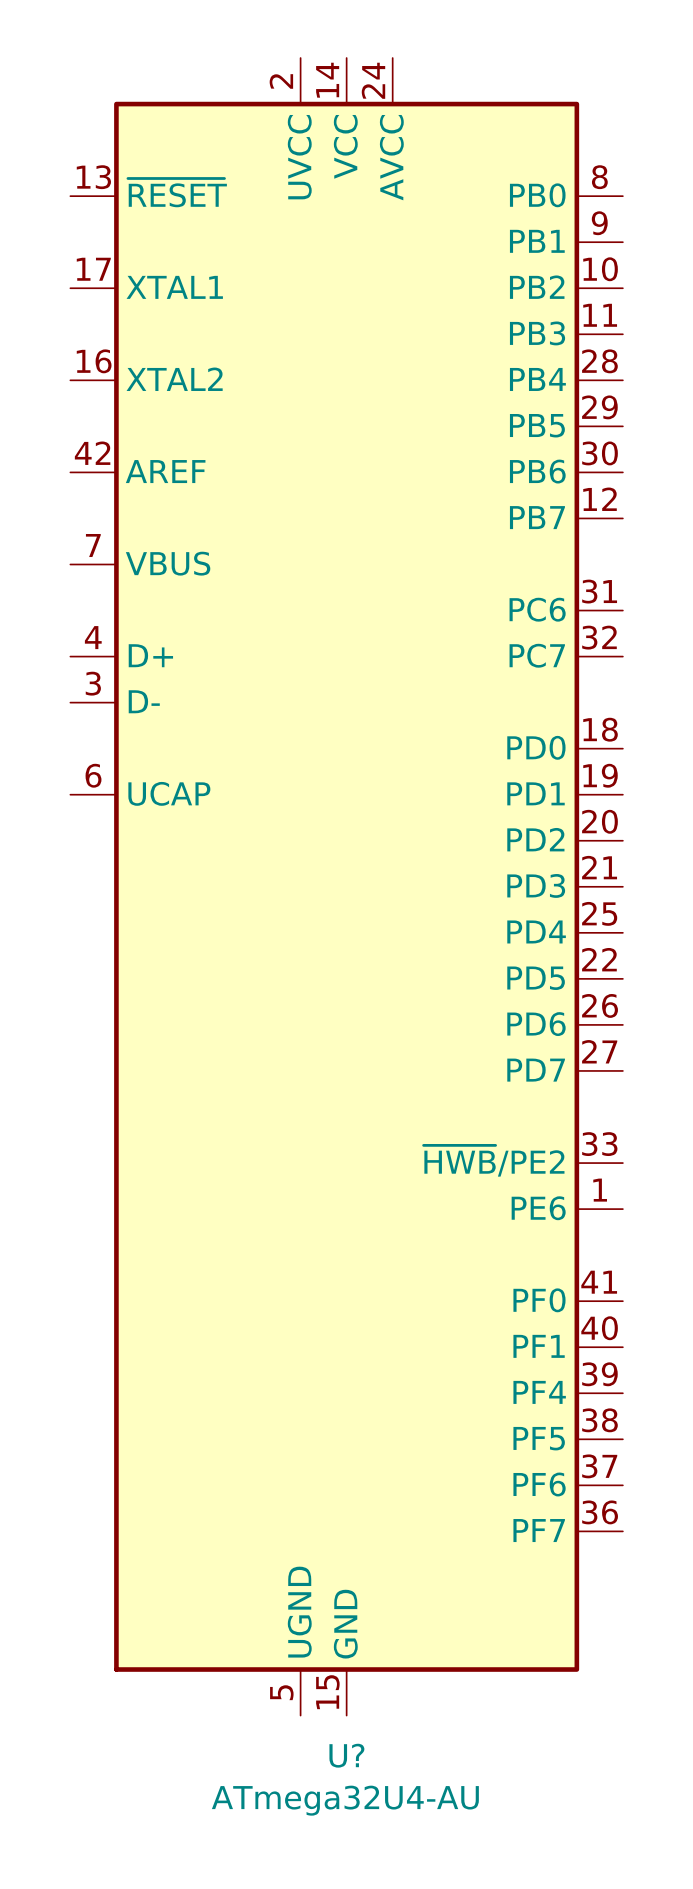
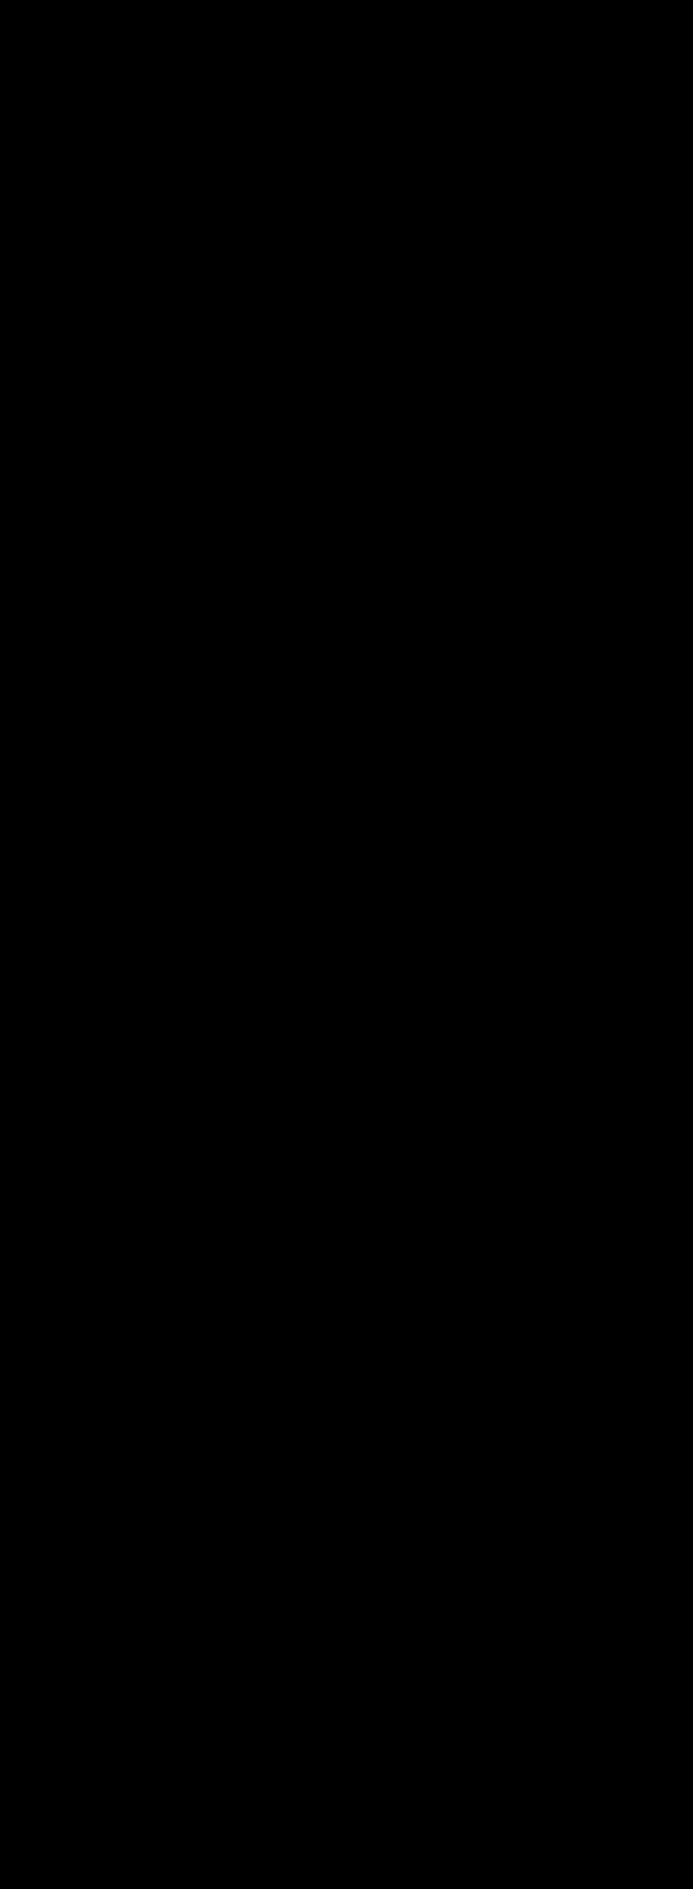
U?: ATmega32U4-AU (346, 886) -> none

